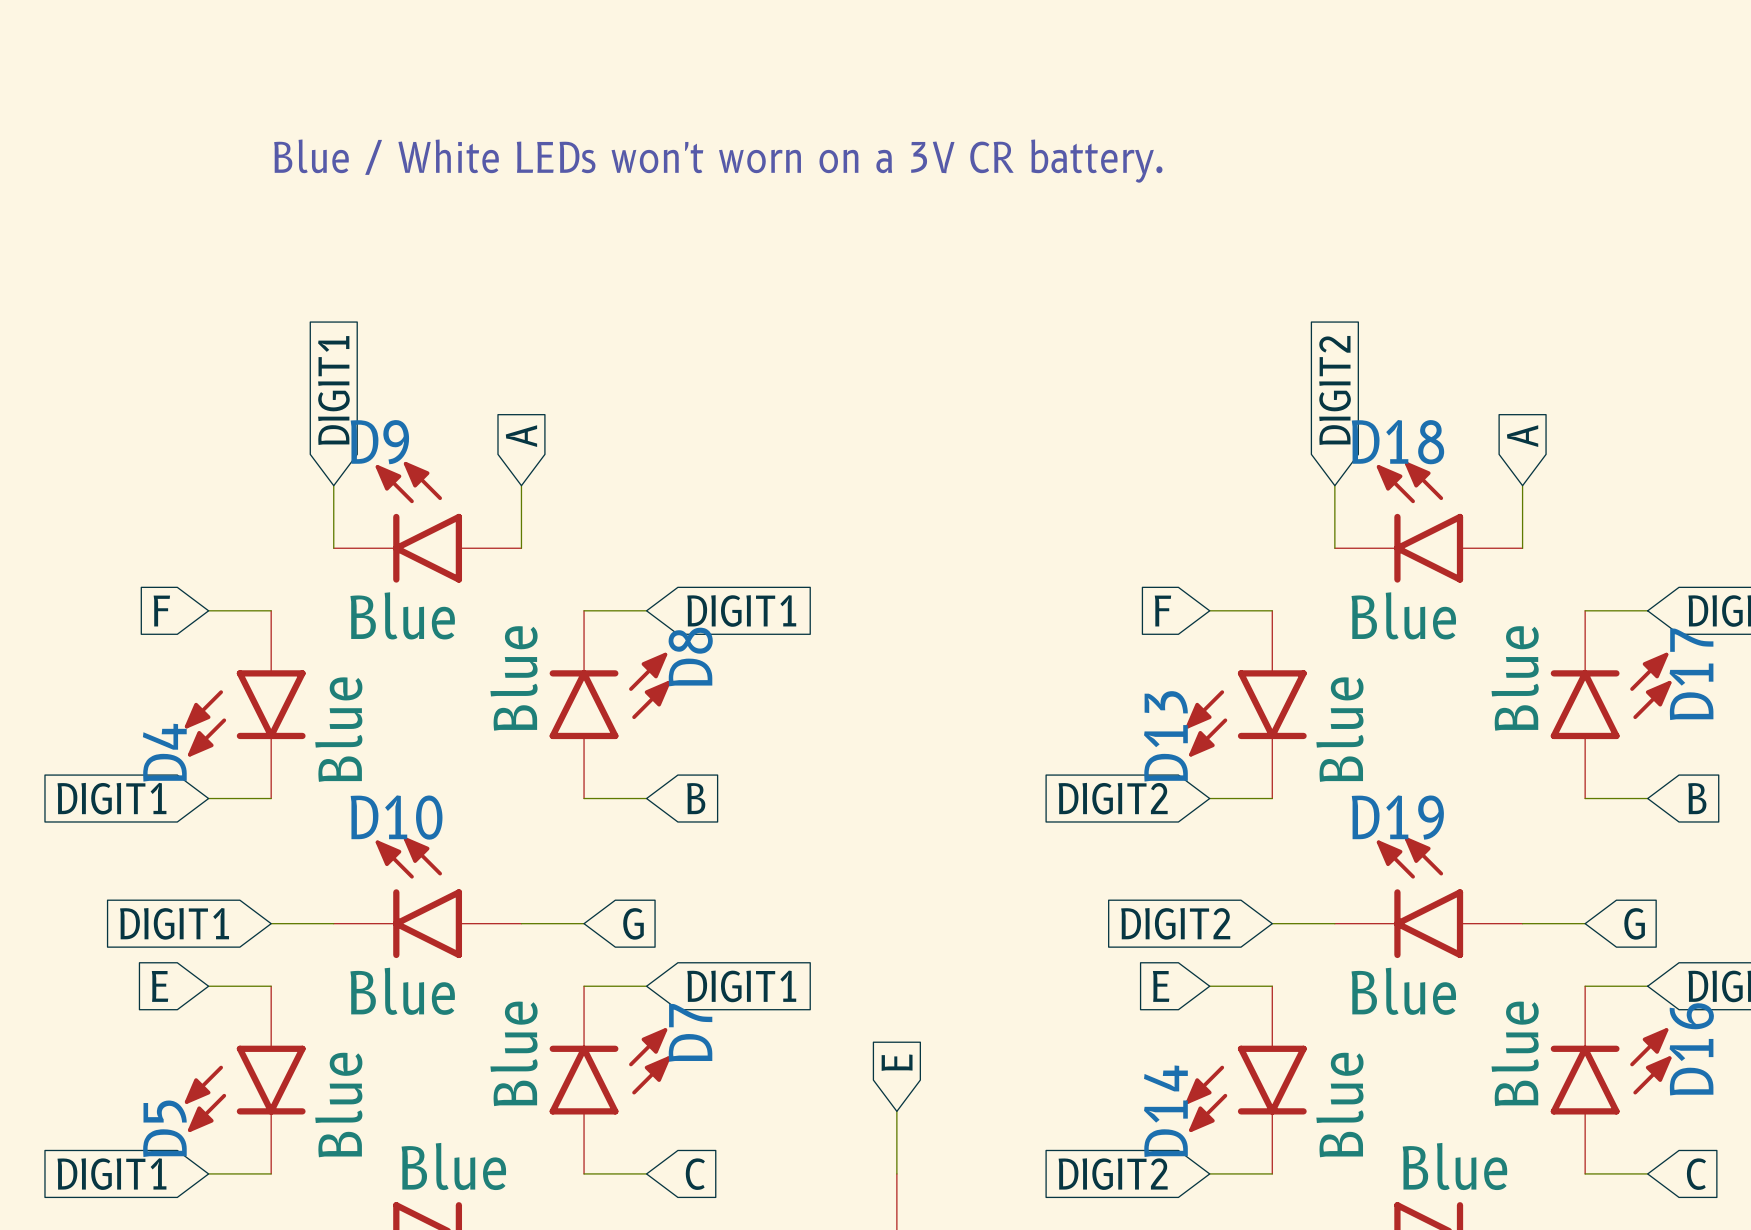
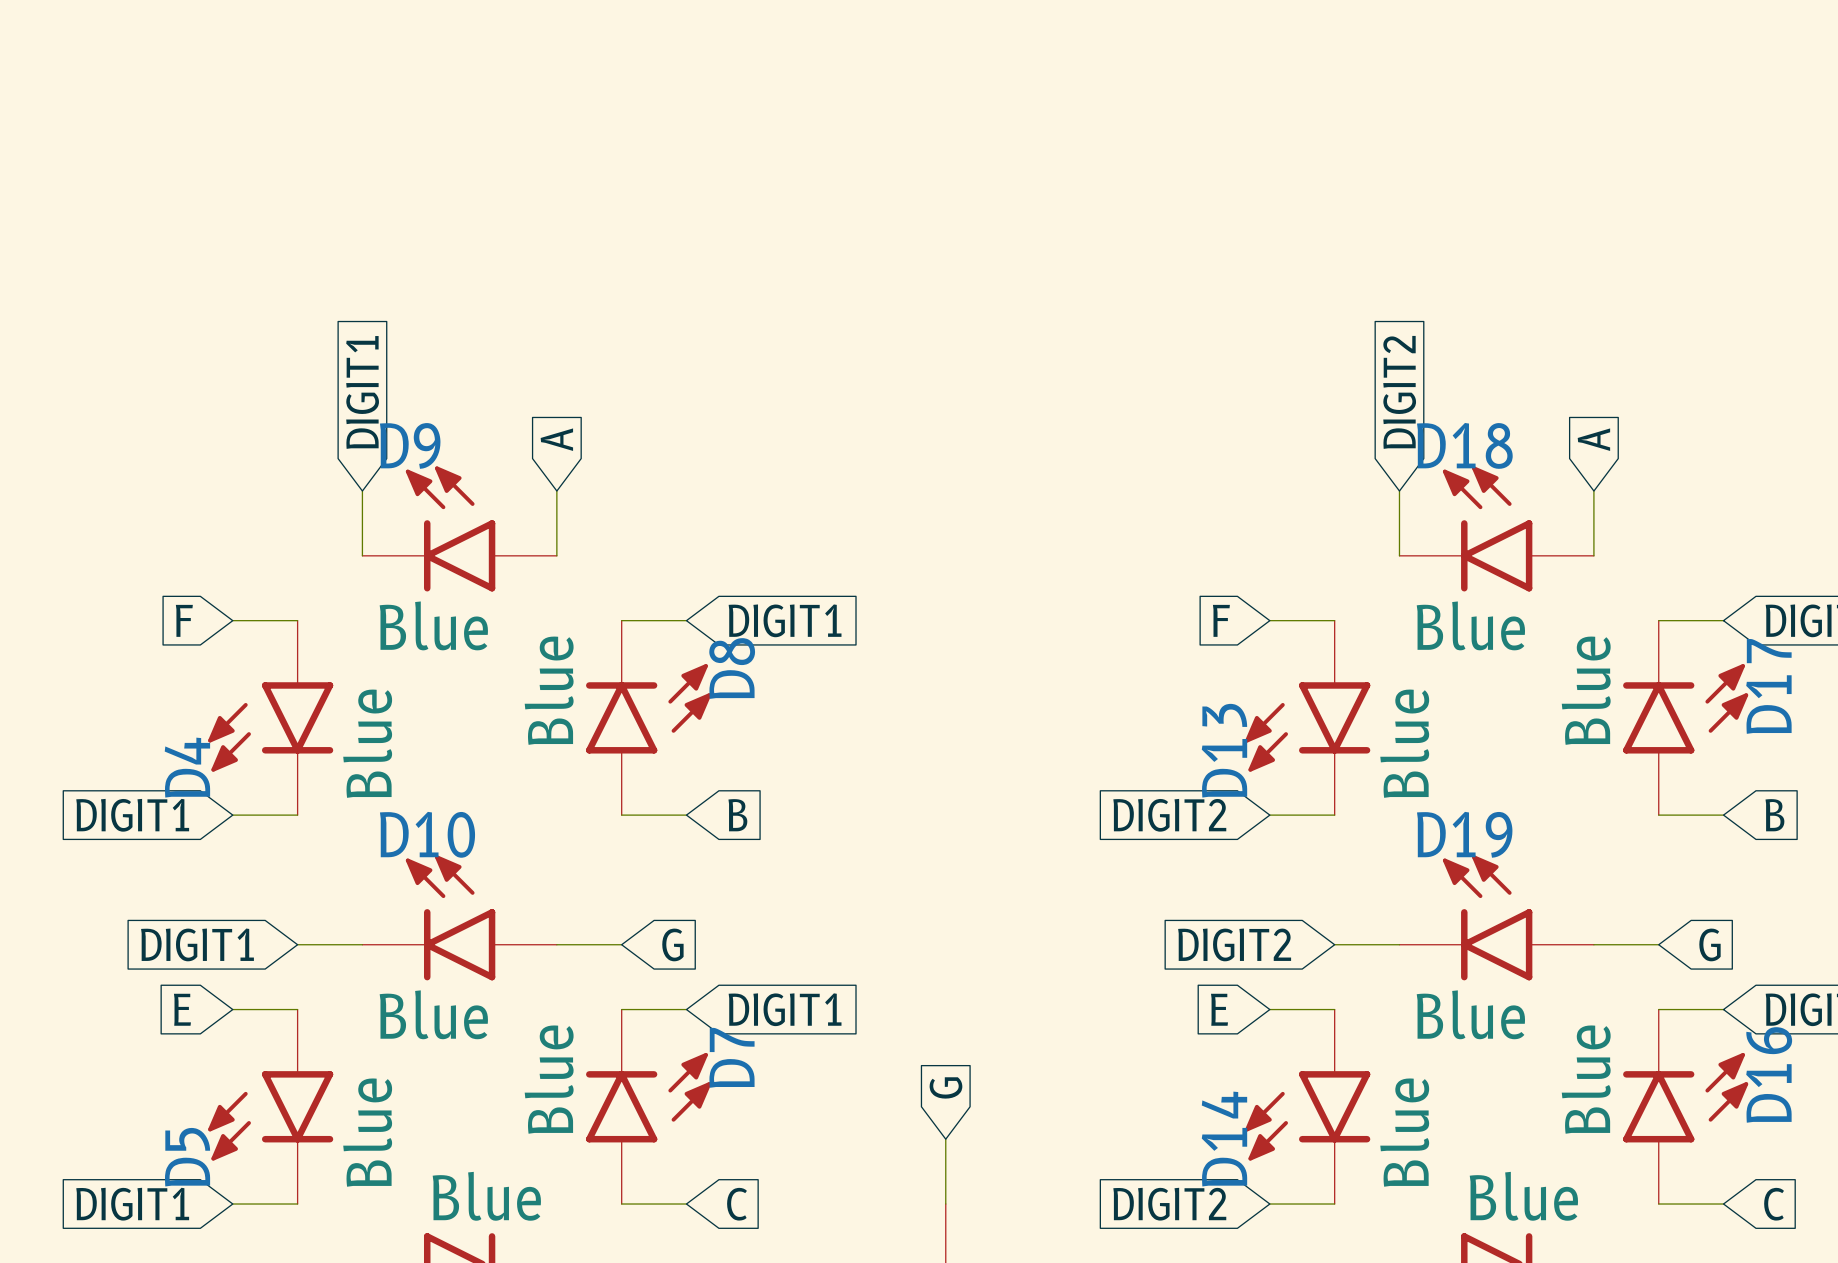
text: Blue / White LEDs won't worn on a 3V CR battery. (718, 161) -> none
global label: E (897, 1062) -> G (945, 1087)

